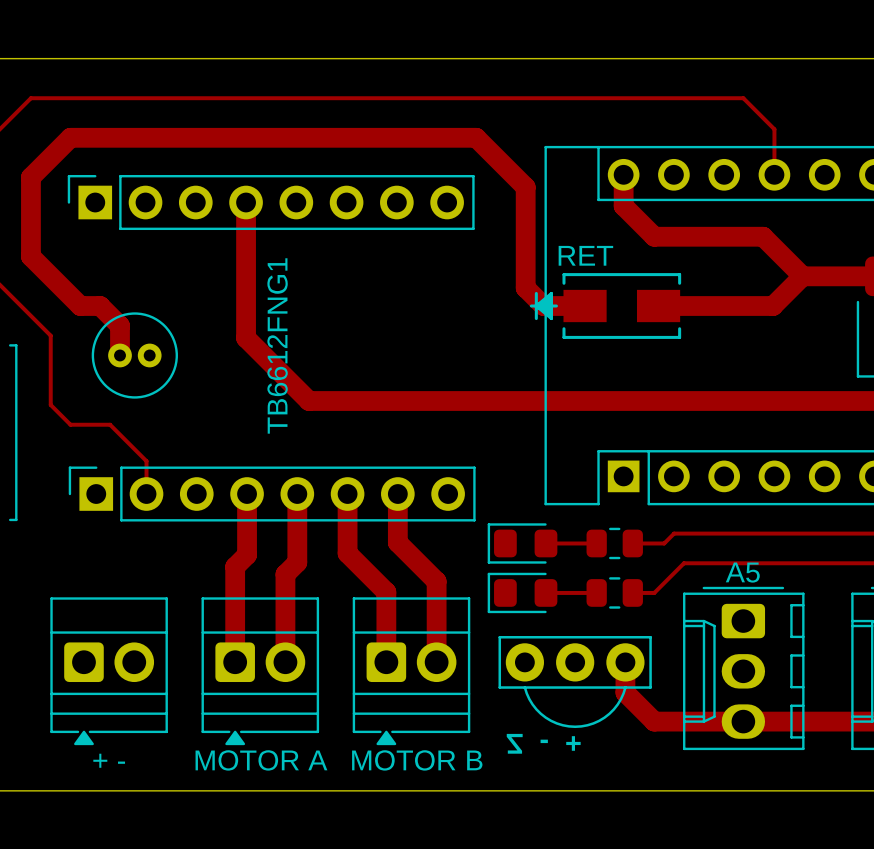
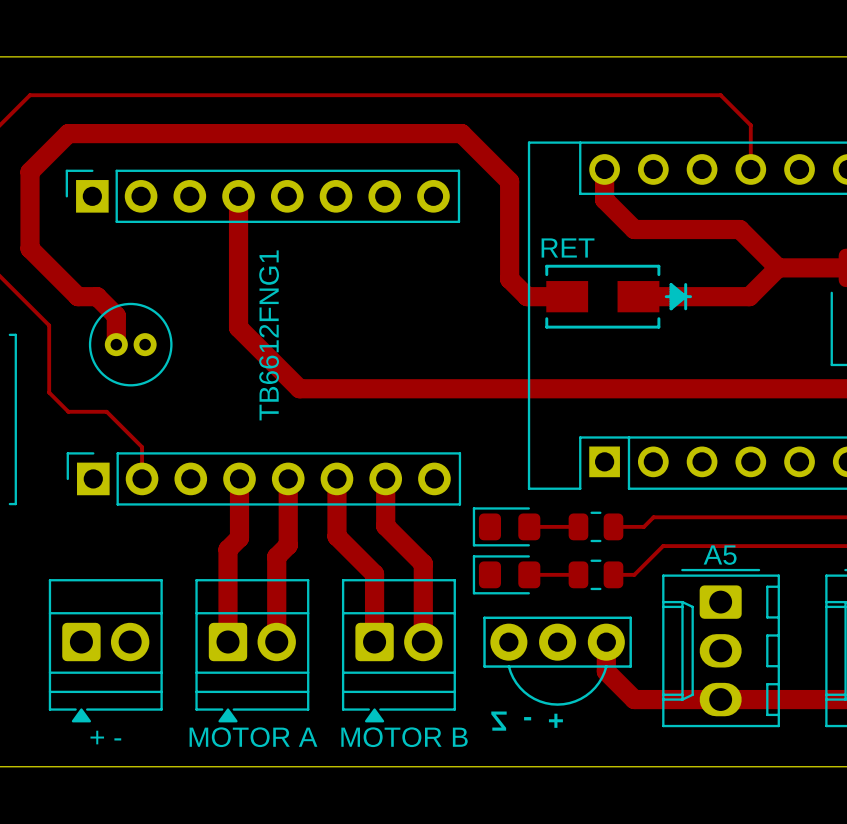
RET rotation: 0° (605, 306) -> 180° (618, 296)

